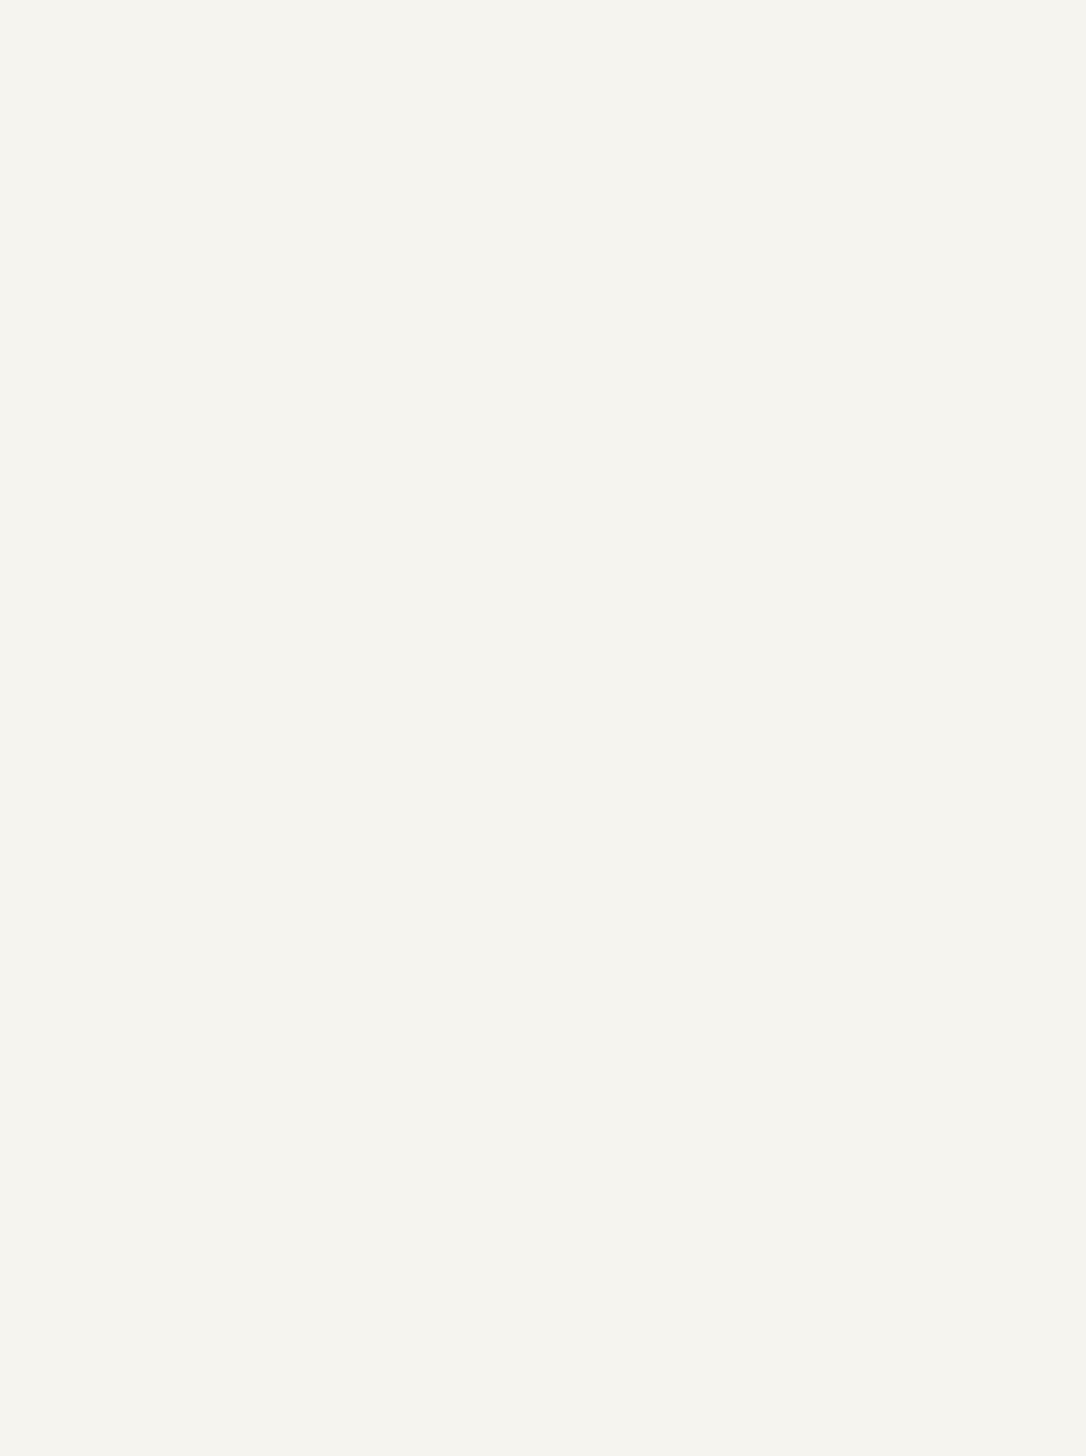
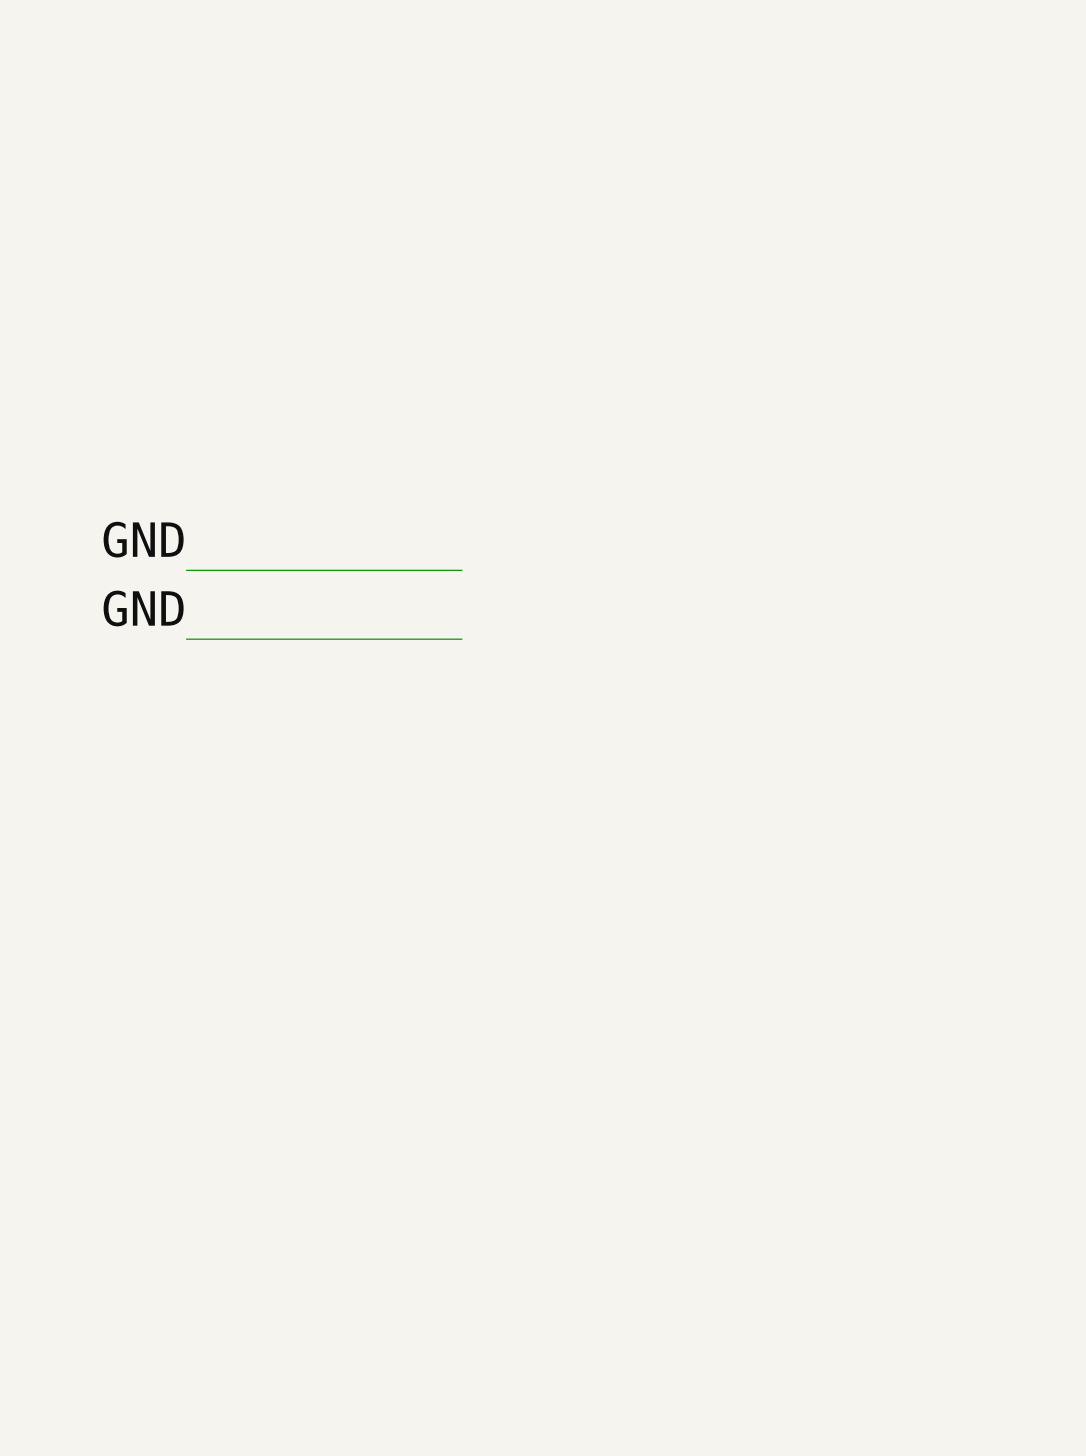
label: none -> GND (143, 539)
wire: none -> (186, 570) (461, 570)
label: none -> GND (143, 608)
wire: none -> (186, 639) (461, 639)

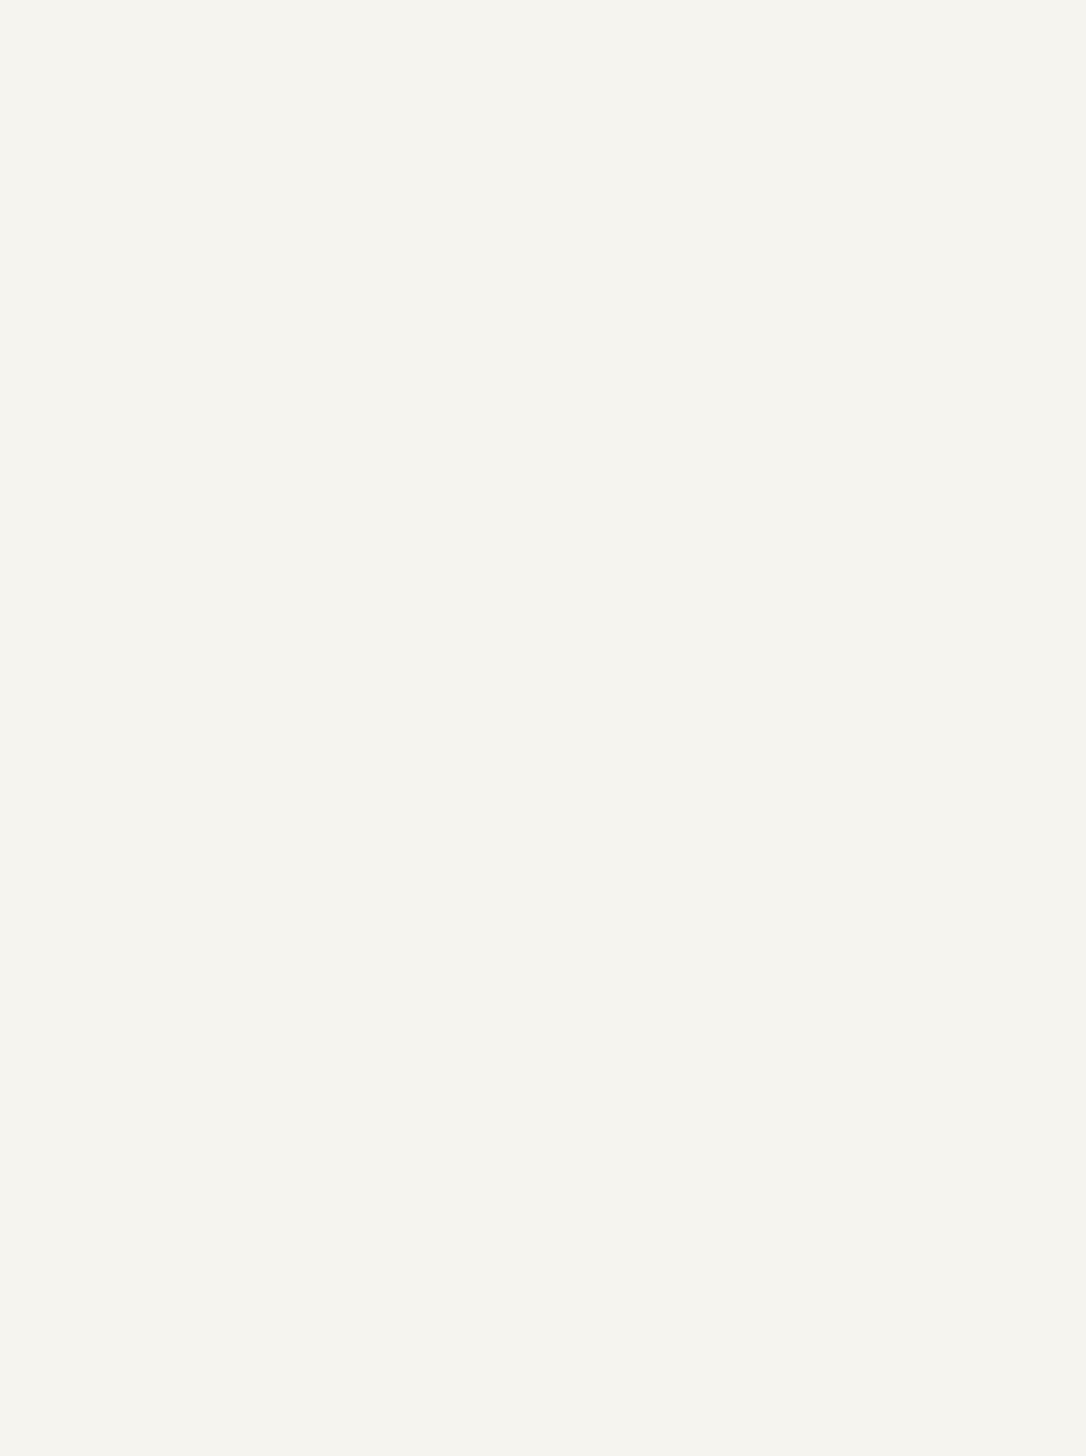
label: GND (143, 539) -> none
wire: (186, 570) (461, 570) -> none
label: GND (143, 608) -> none
wire: (186, 639) (461, 639) -> none

